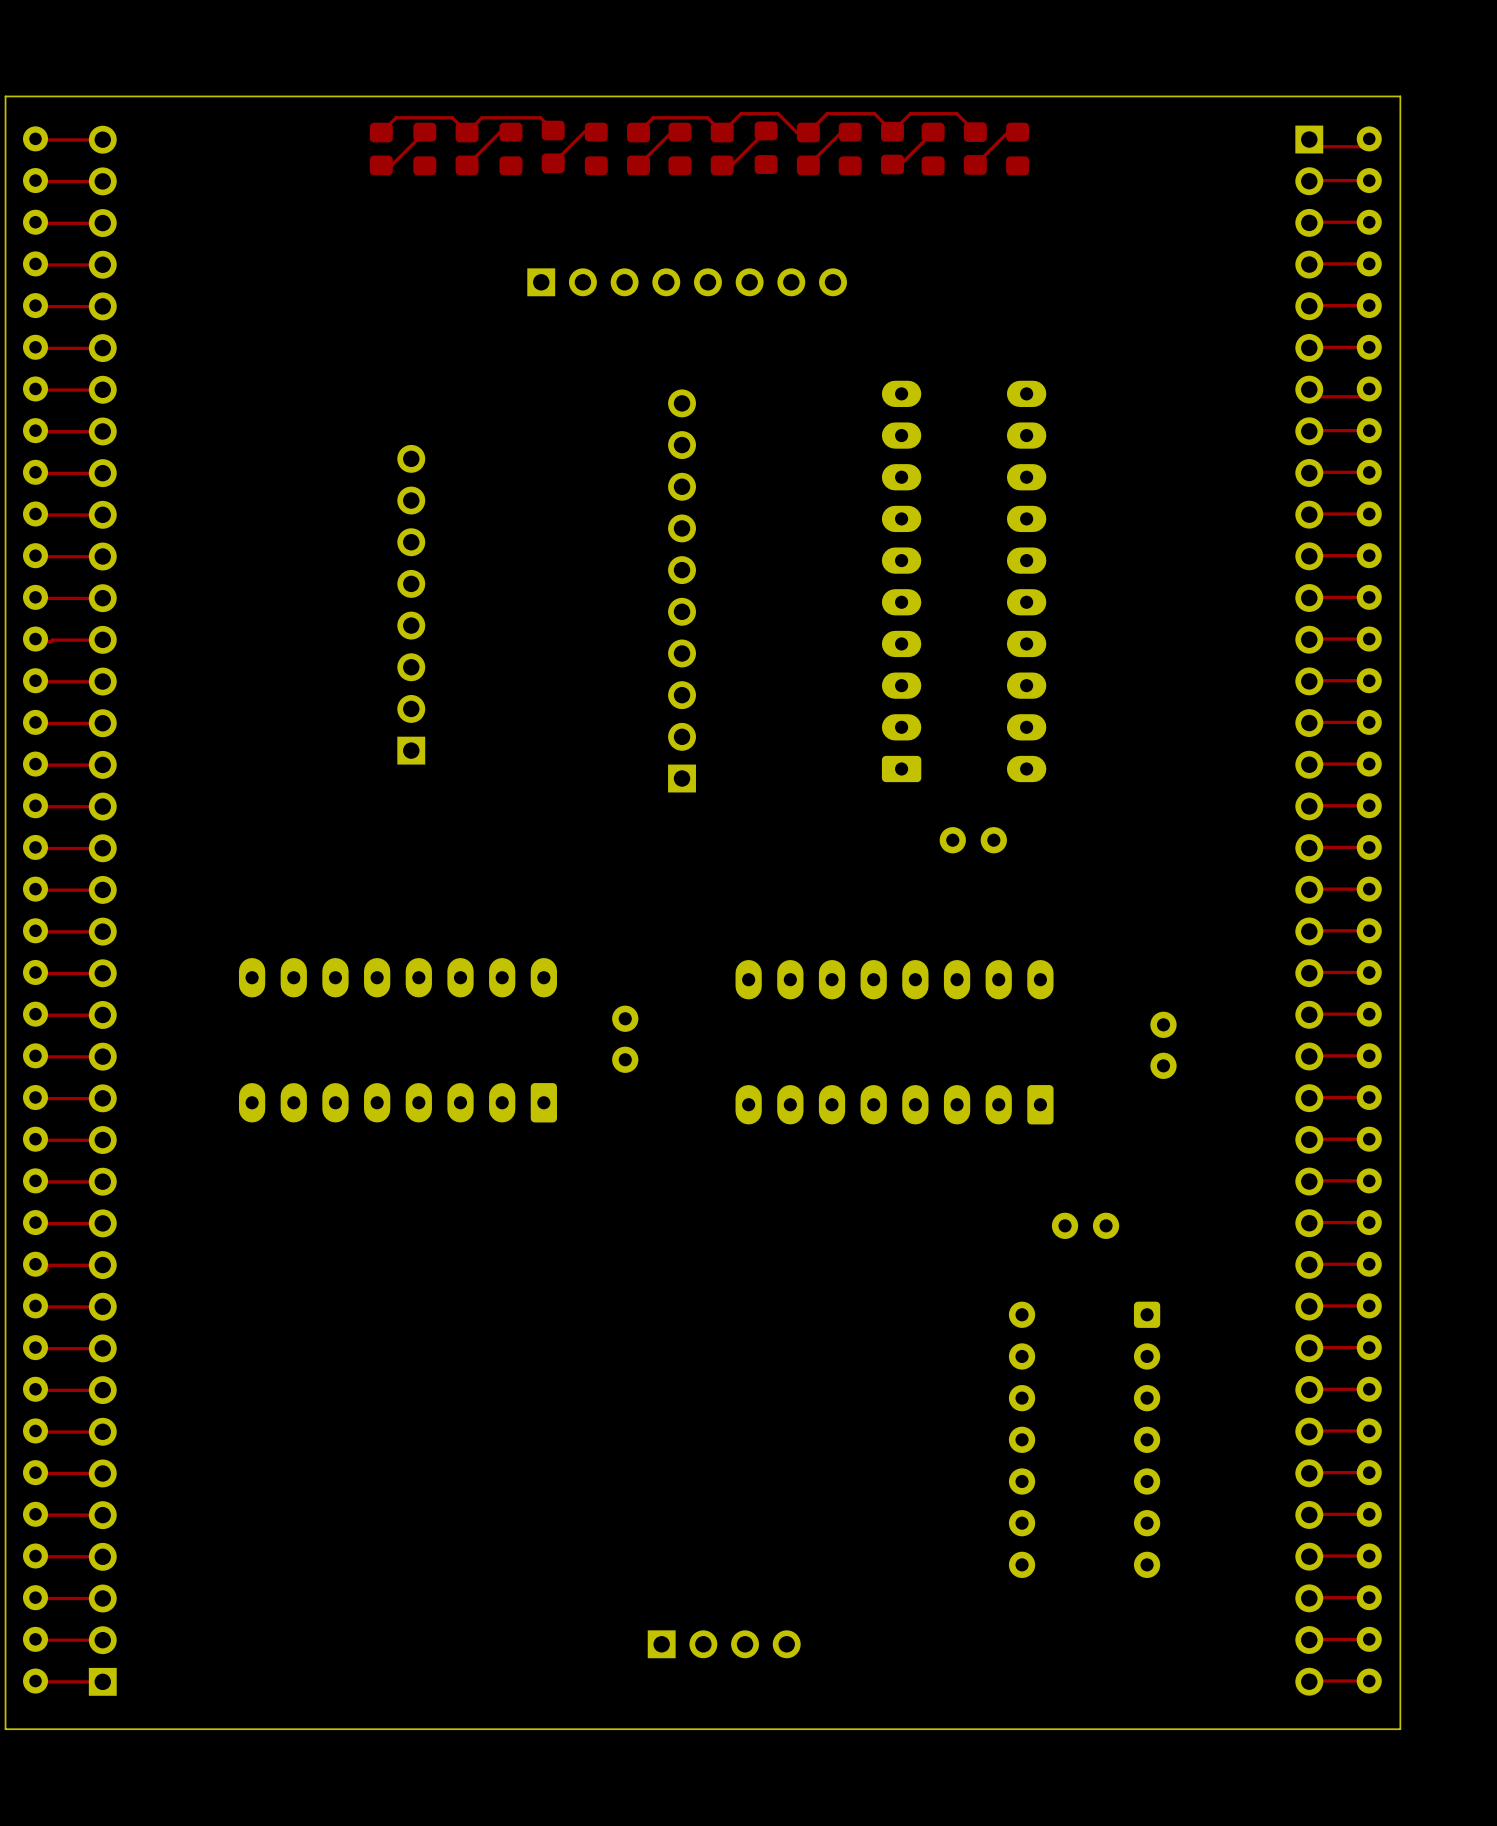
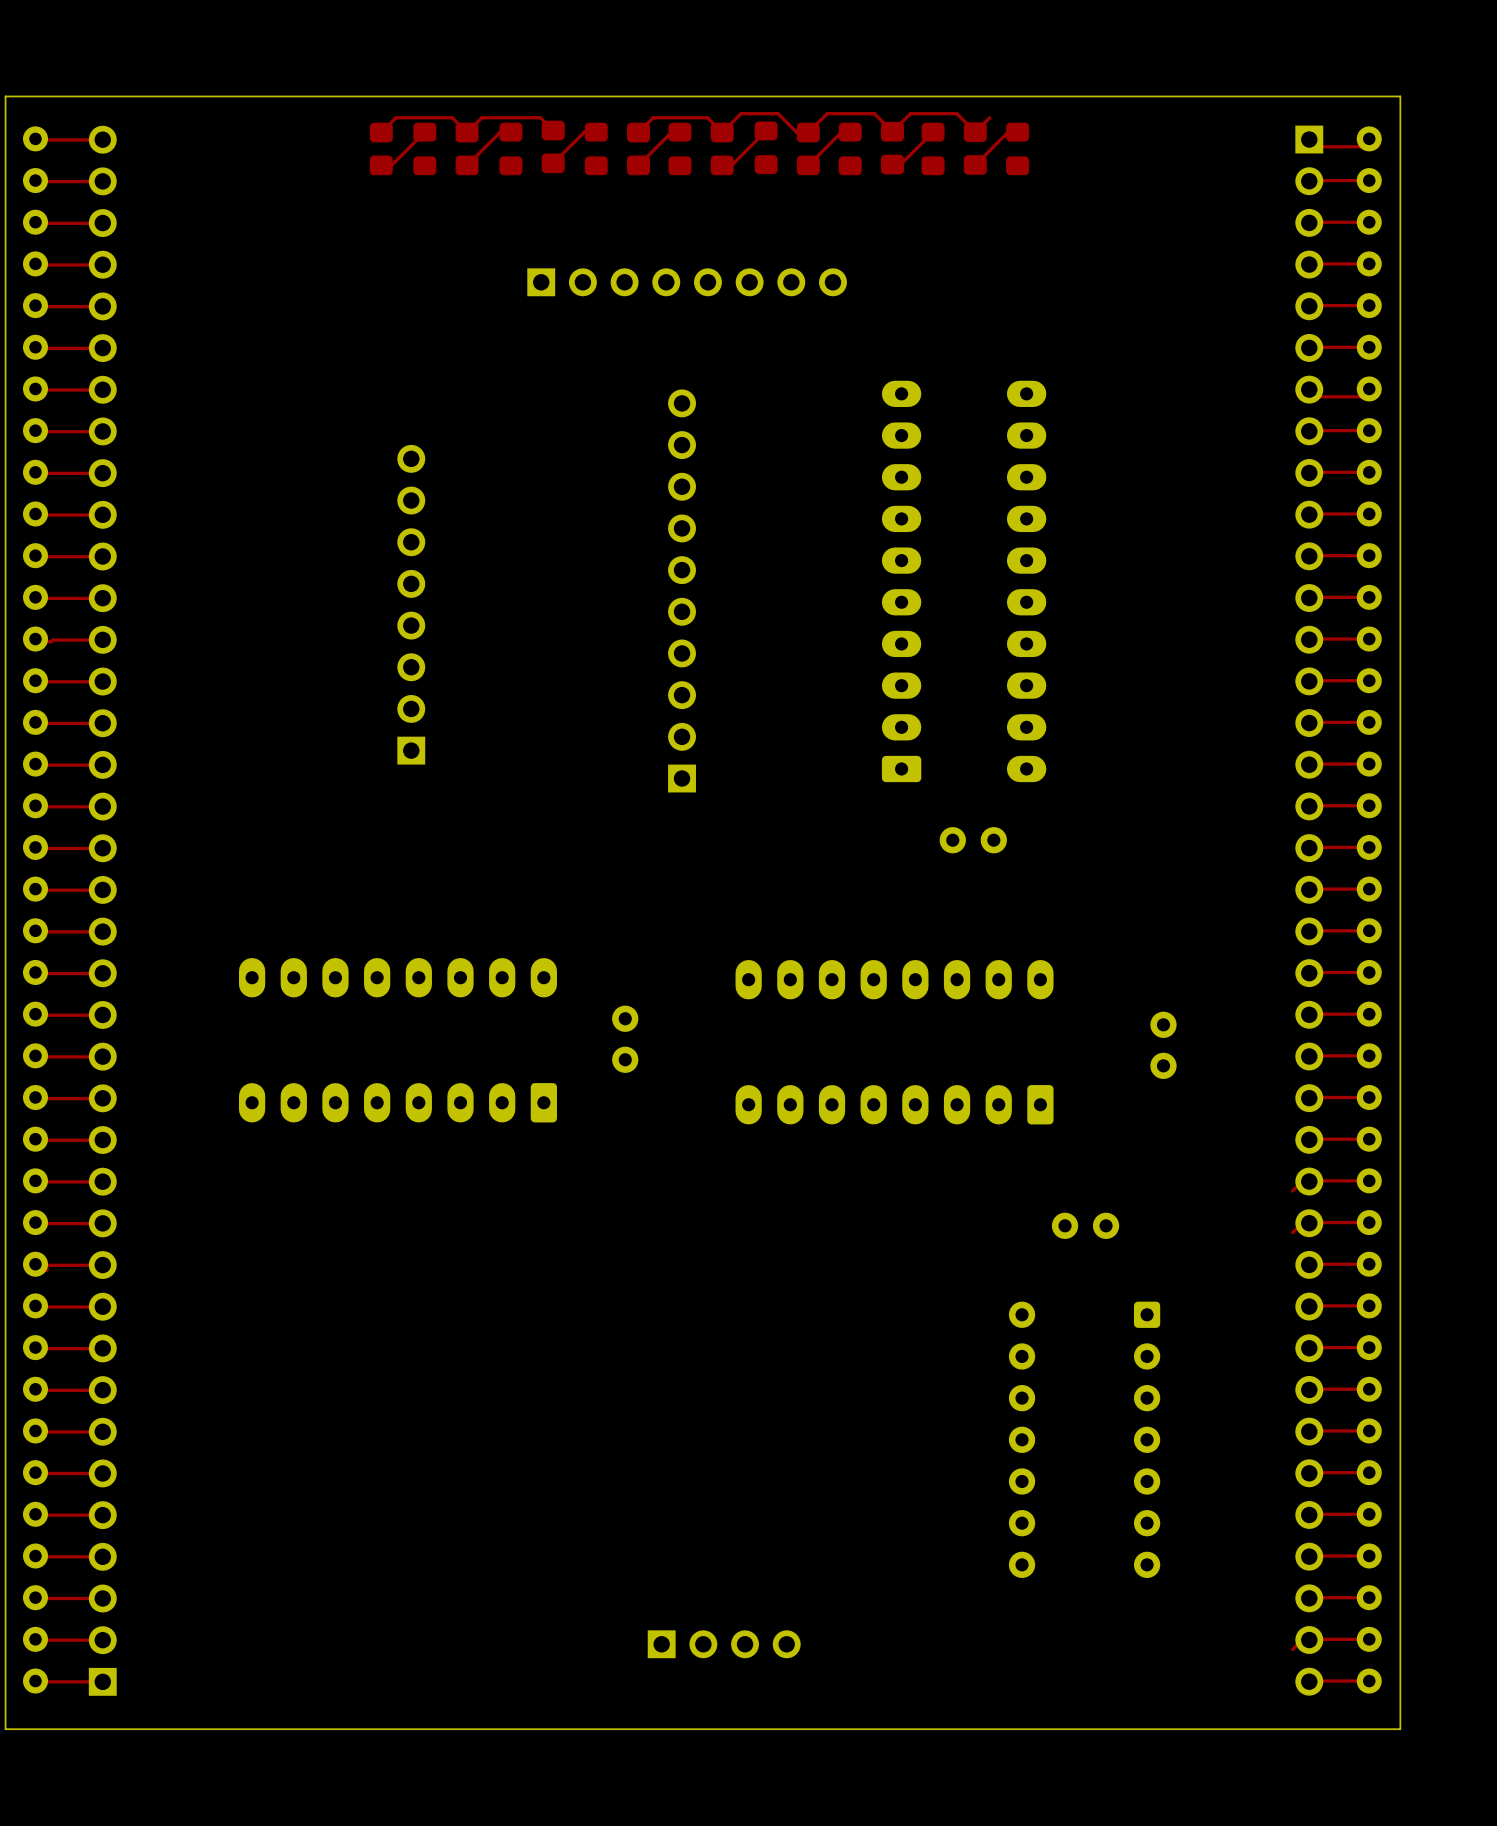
top track: none -> (989, 117) (975, 132)
top track: none -> (1297, 1185) (1292, 1190)
top track: none -> (1297, 1227) (1292, 1232)
top track: none -> (1297, 1644) (1292, 1649)

